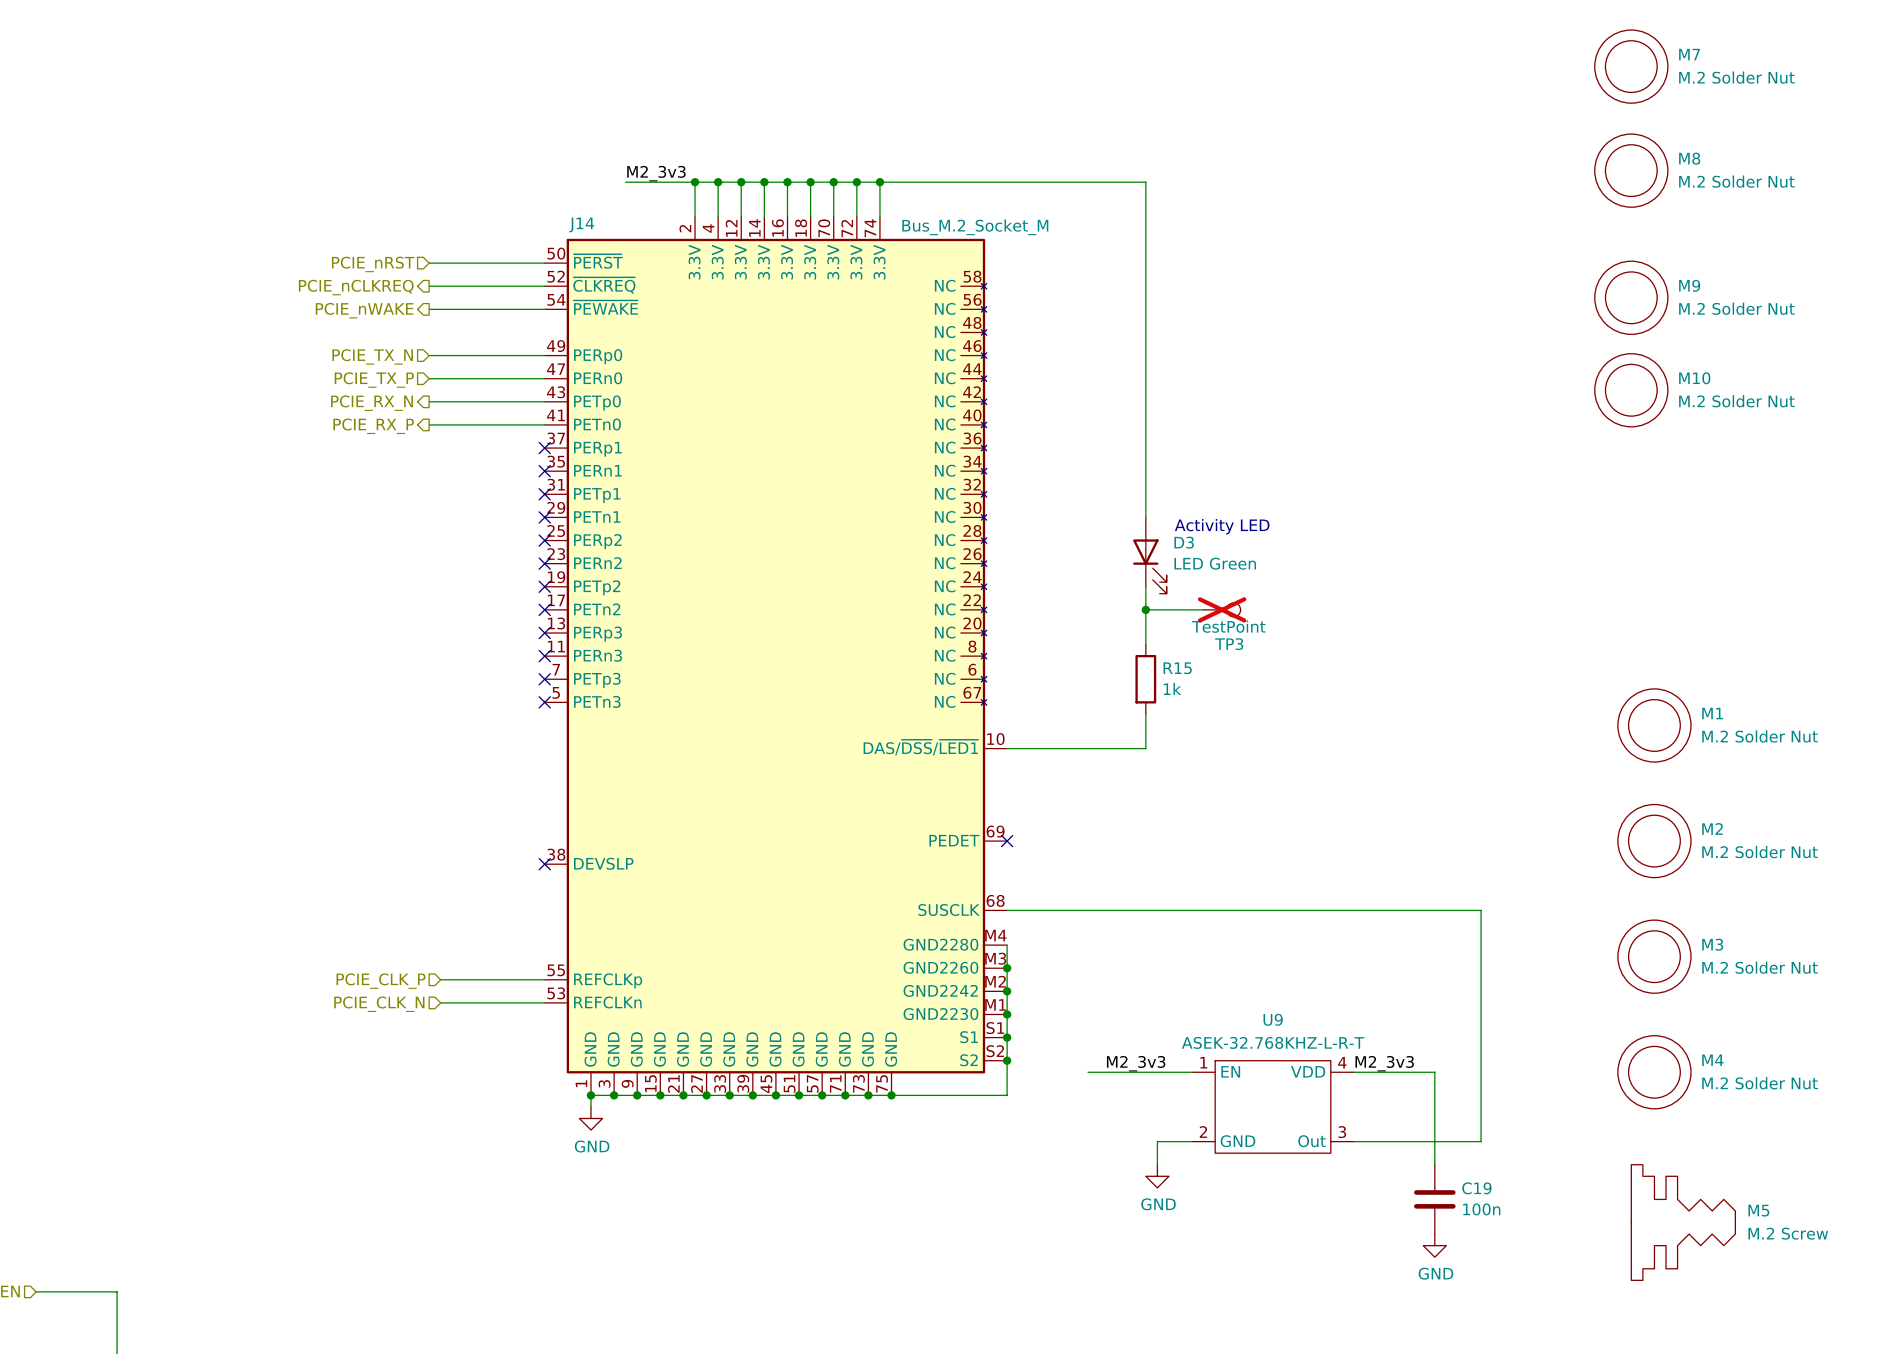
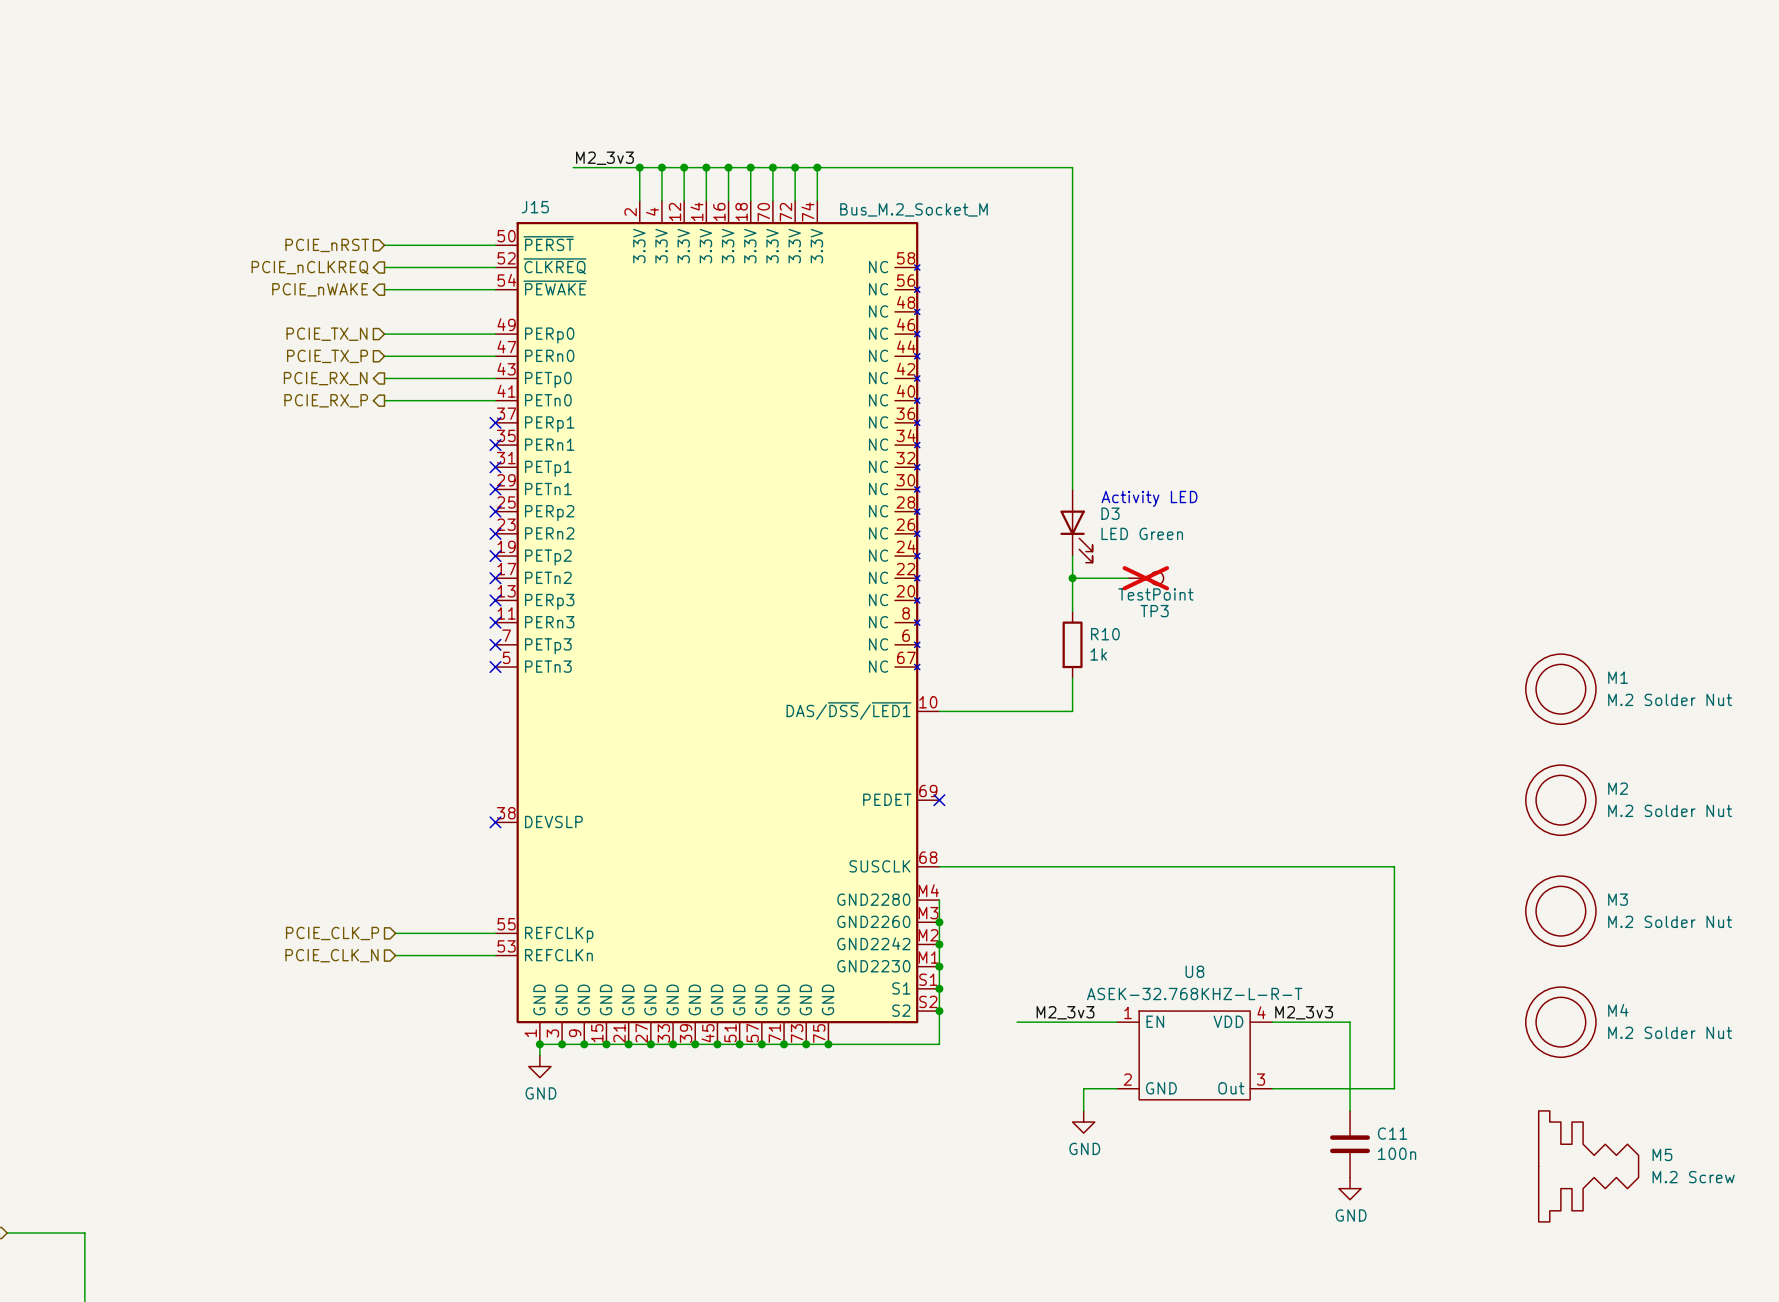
M7: M.2 Solder Nut (1631, 66) -> none
M8: M.2 Solder Nut (1631, 170) -> none
J14 name: J14 (581, 224) -> J15 (535, 207)
M9: M.2 Solder Nut (1631, 297) -> none
M10: M.2 Solder Nut (1631, 390) -> none
R15 name: R15 (1177, 668) -> R10 (1105, 634)
U9 name: U9 (1273, 1019) -> U8 (1194, 971)
C19 name: C19 (1476, 1188) -> C11 (1392, 1133)

